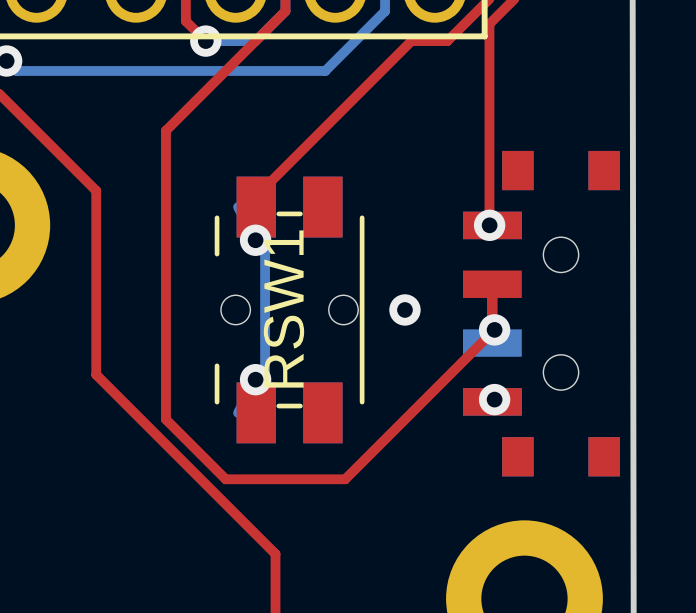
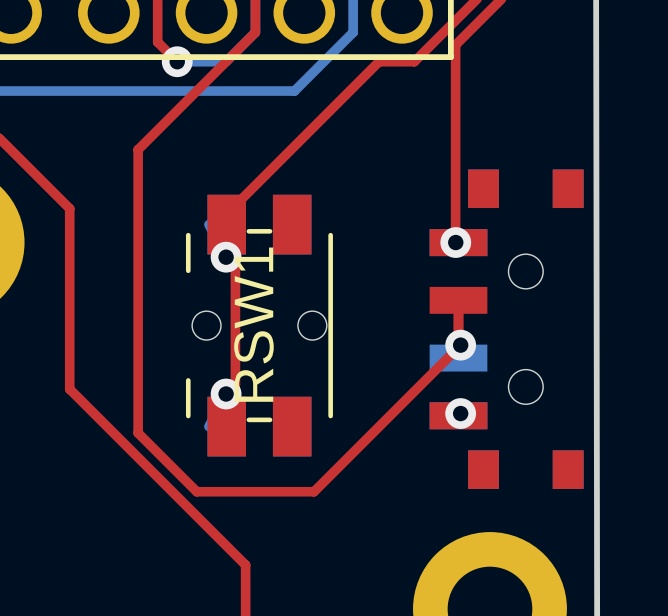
top track: none -> (226, 257) (235, 266) (235, 384) (226, 394)
bottom track: (255, 240) (265, 249) (265, 370) (255, 379) -> none
via: (404, 309) -> none

